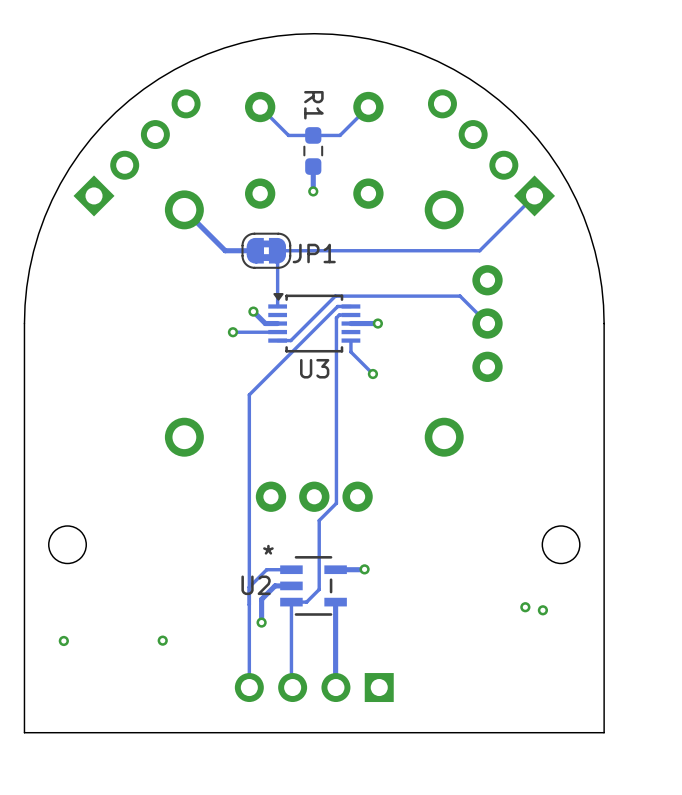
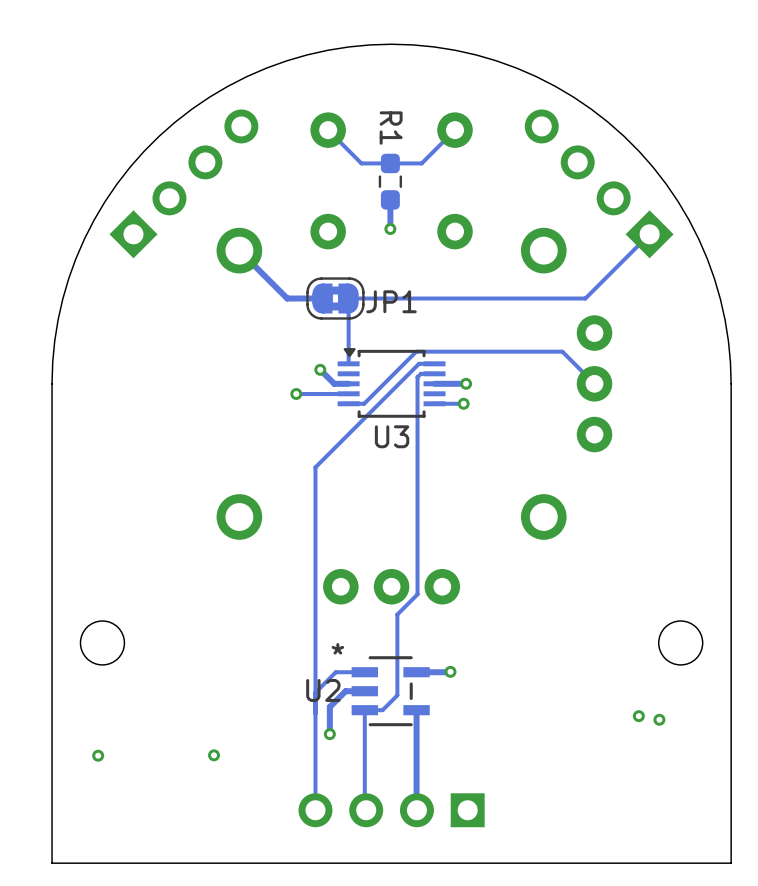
track: (350, 340) (350, 352) (372, 374) -> (434, 403) (463, 403)
via position: (372, 374) -> (463, 403)

